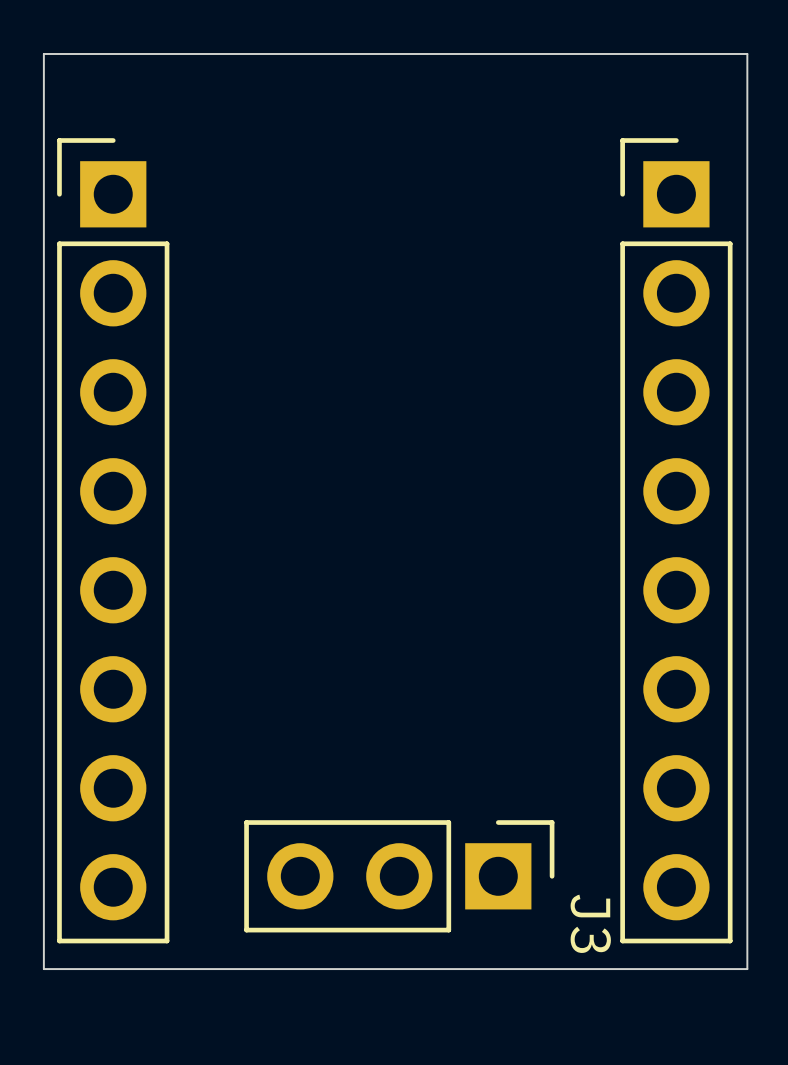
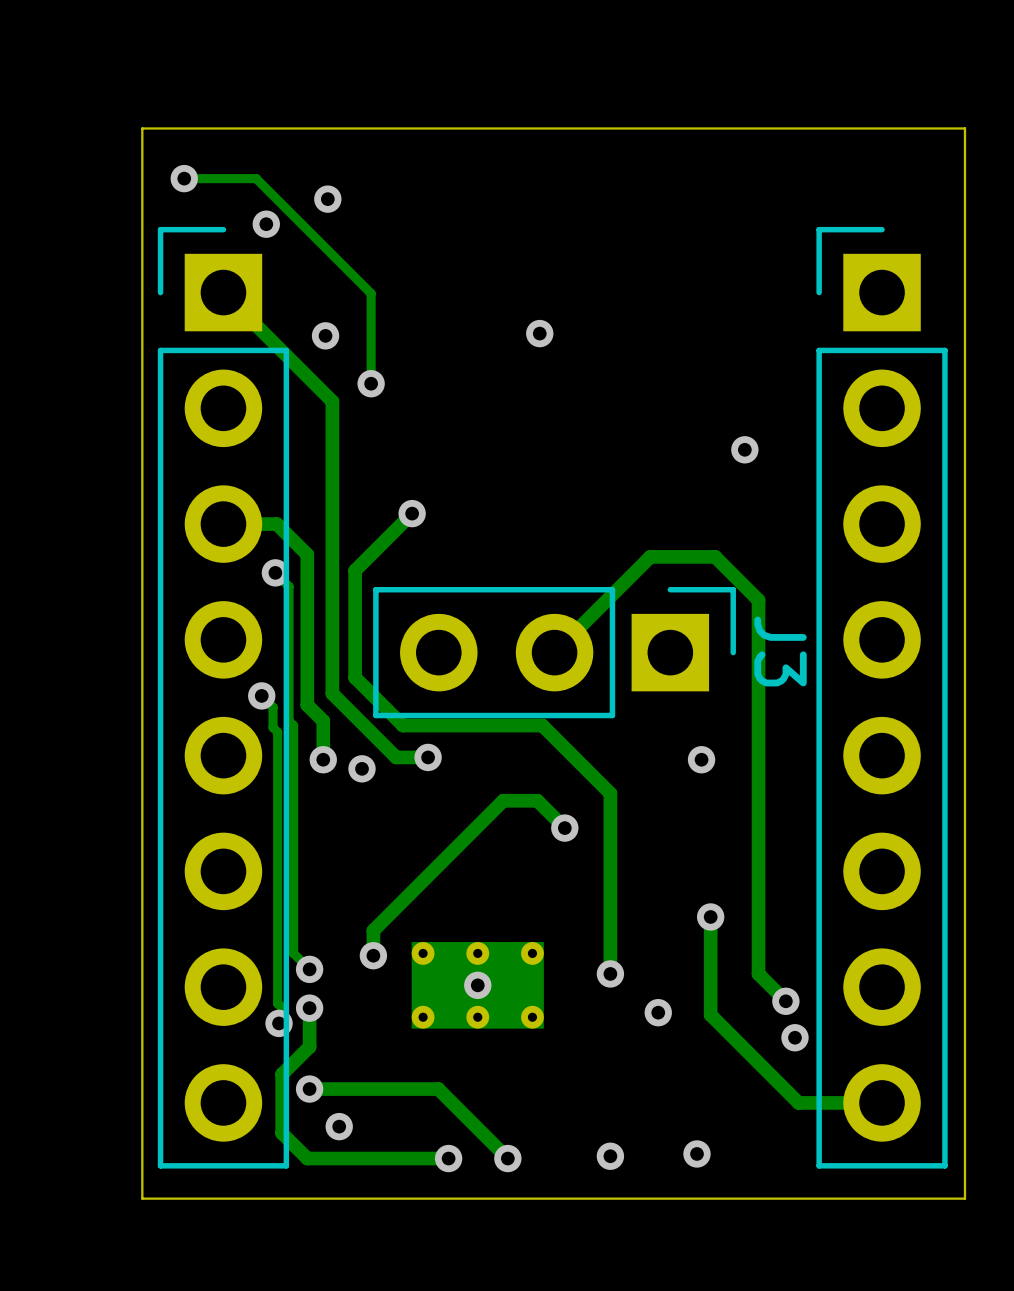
track: none -> (184, 178) (256, 178) (371, 293) (371, 383)
via: none -> (184, 178)
via: none -> (327, 199)
via: none -> (266, 224)
track: none -> (223, 292) (332, 401) (332, 693) (396, 757) (428, 757)
via: none -> (539, 333)
via: none -> (325, 335)
via: none -> (371, 383)
via: none -> (744, 449)
track: none -> (412, 513) (355, 570) (355, 677) (403, 725) (542, 725) (610, 793) (610, 973)
via: none -> (412, 513)
track: none -> (223, 524) (276, 524) (307, 554) (307, 705) (323, 720) (323, 759)
track: none -> (275, 572) (289, 586) (289, 720) (293, 725) (293, 953) (309, 969)
via: none -> (275, 572)
track: none -> (554, 652) (650, 556) (715, 556) (758, 600) (758, 973) (785, 1001)
track: none -> (261, 695) (273, 707) (273, 727) (277, 732) (277, 1003) (282, 1008) (282, 1020) (279, 1023)
via: none -> (261, 695)
via: none -> (428, 757)
via: none -> (323, 759)
via: none -> (701, 759)
via: none -> (362, 768)
track: none -> (564, 828) (537, 800) (503, 800) (373, 930) (373, 955)
via: none -> (564, 828)
track: none -> (710, 916) (710, 1014) (798, 1102) (882, 1102)
via: none -> (710, 916)
via: none -> (373, 955)
via: none -> (309, 969)
via: none -> (610, 973)
part: none -> (477, 985)
via: none -> (477, 985)
via: none -> (785, 1001)
track: none -> (309, 1008) (309, 1046) (282, 1074) (282, 1133) (307, 1158) (448, 1158)
via: none -> (309, 1008)
via: none -> (658, 1012)
via: none -> (279, 1023)
via: none -> (794, 1037)
track: none -> (309, 1089) (438, 1089) (507, 1158)
via: none -> (309, 1089)
J3 position: (399, 876) -> (554, 652)
via: none -> (339, 1126)
J3 name position: J3 (590, 923) -> J3 (780, 651)
via: none -> (697, 1153)
via: none -> (610, 1156)
via: none -> (448, 1158)
via: none -> (507, 1158)

